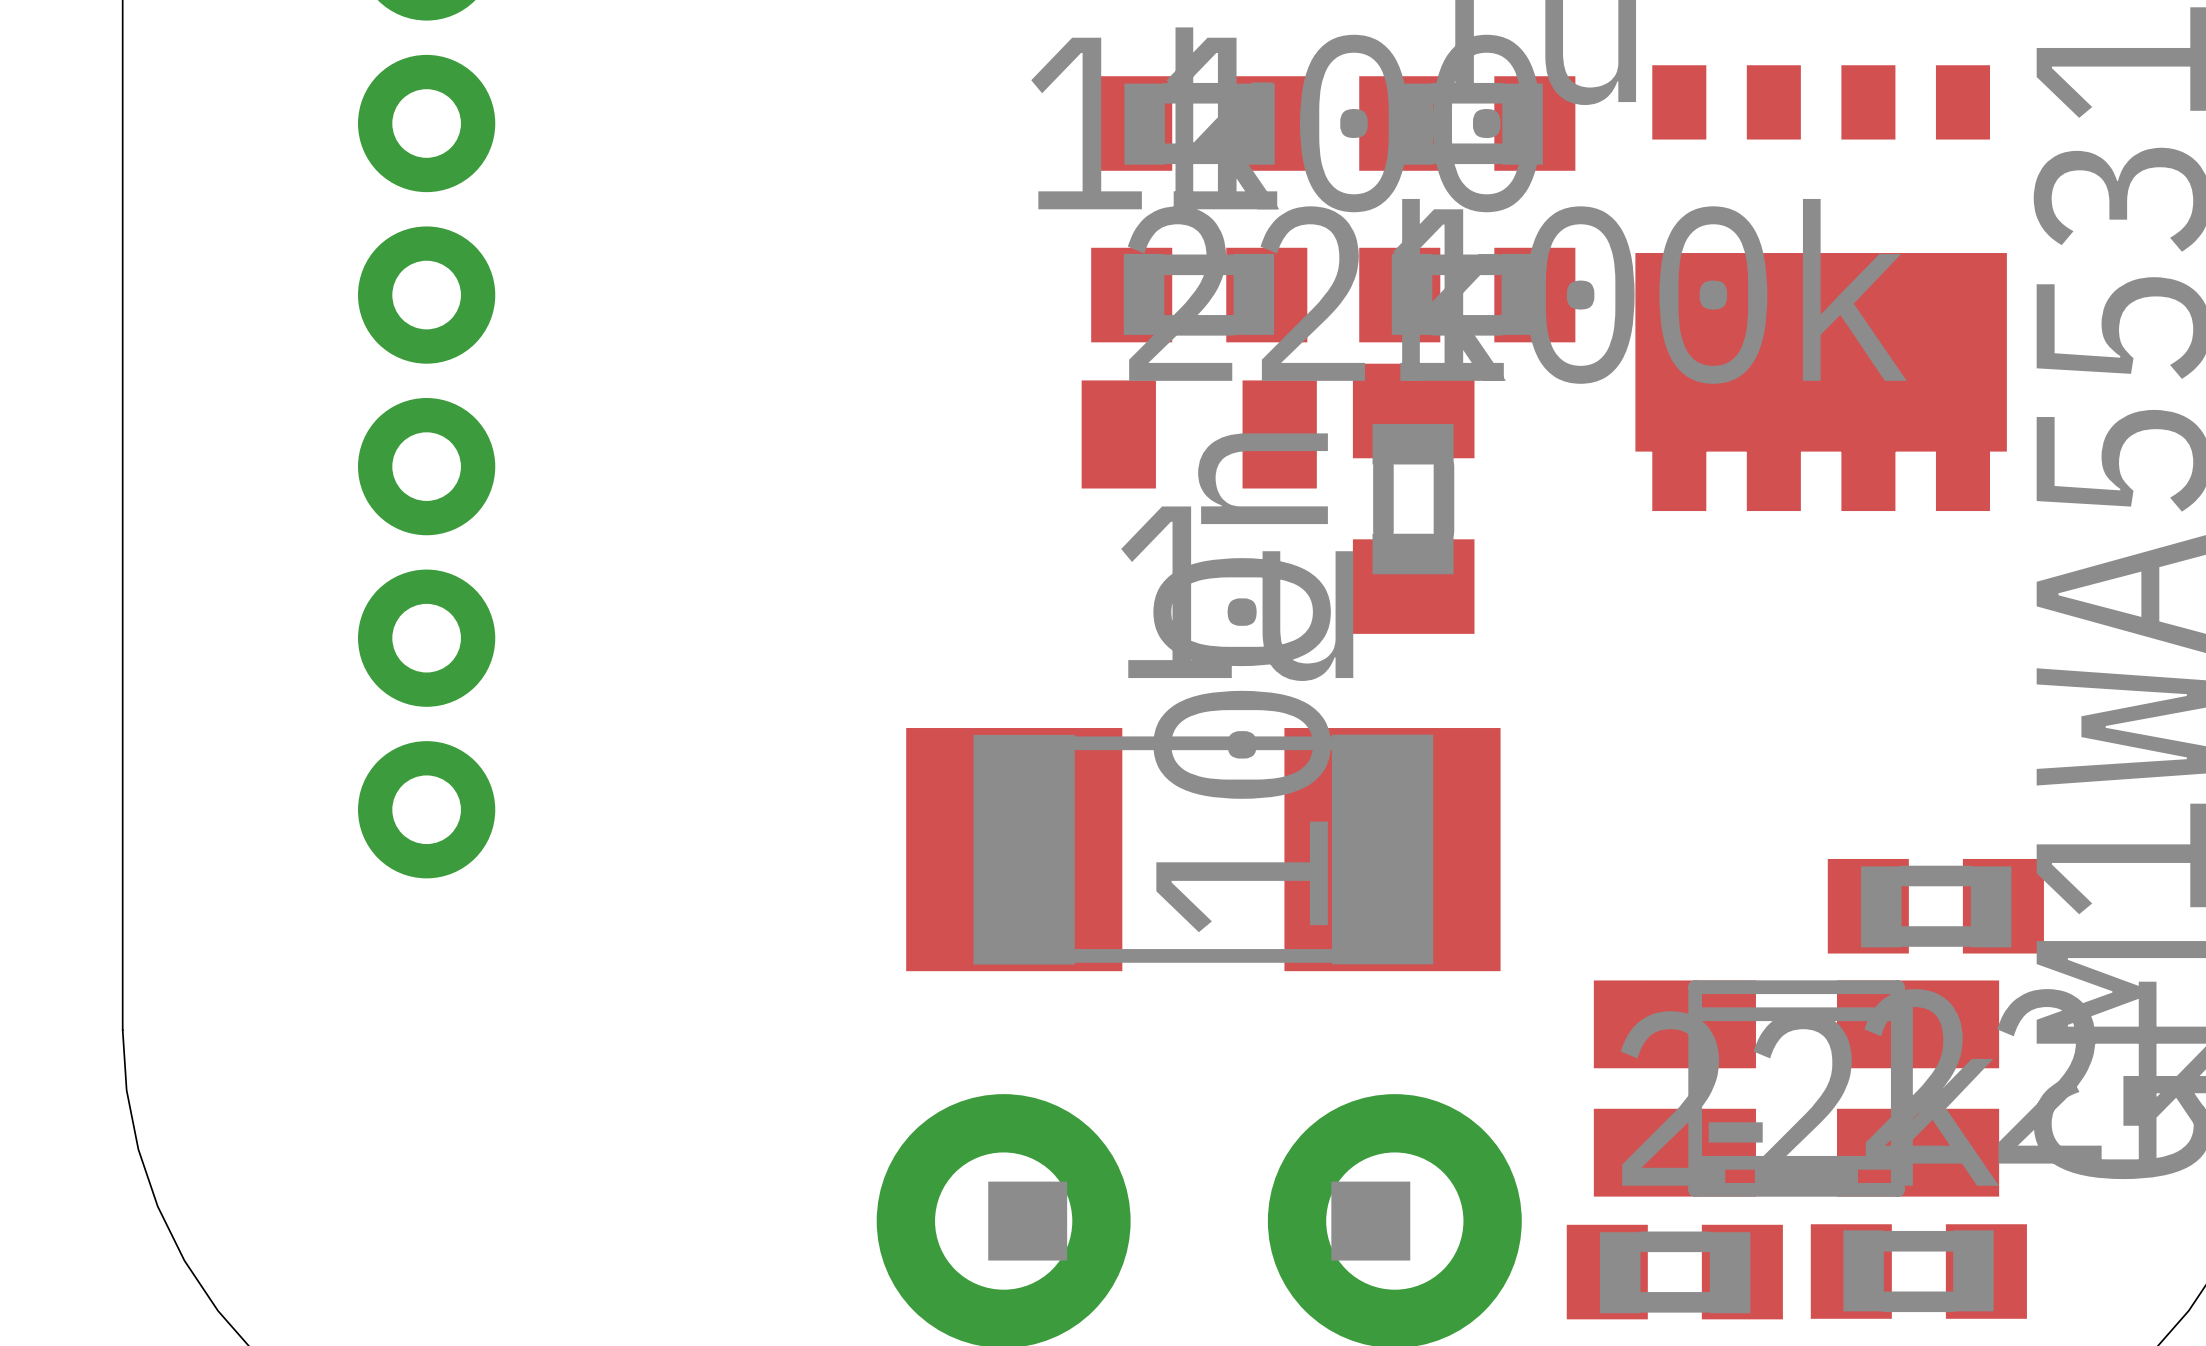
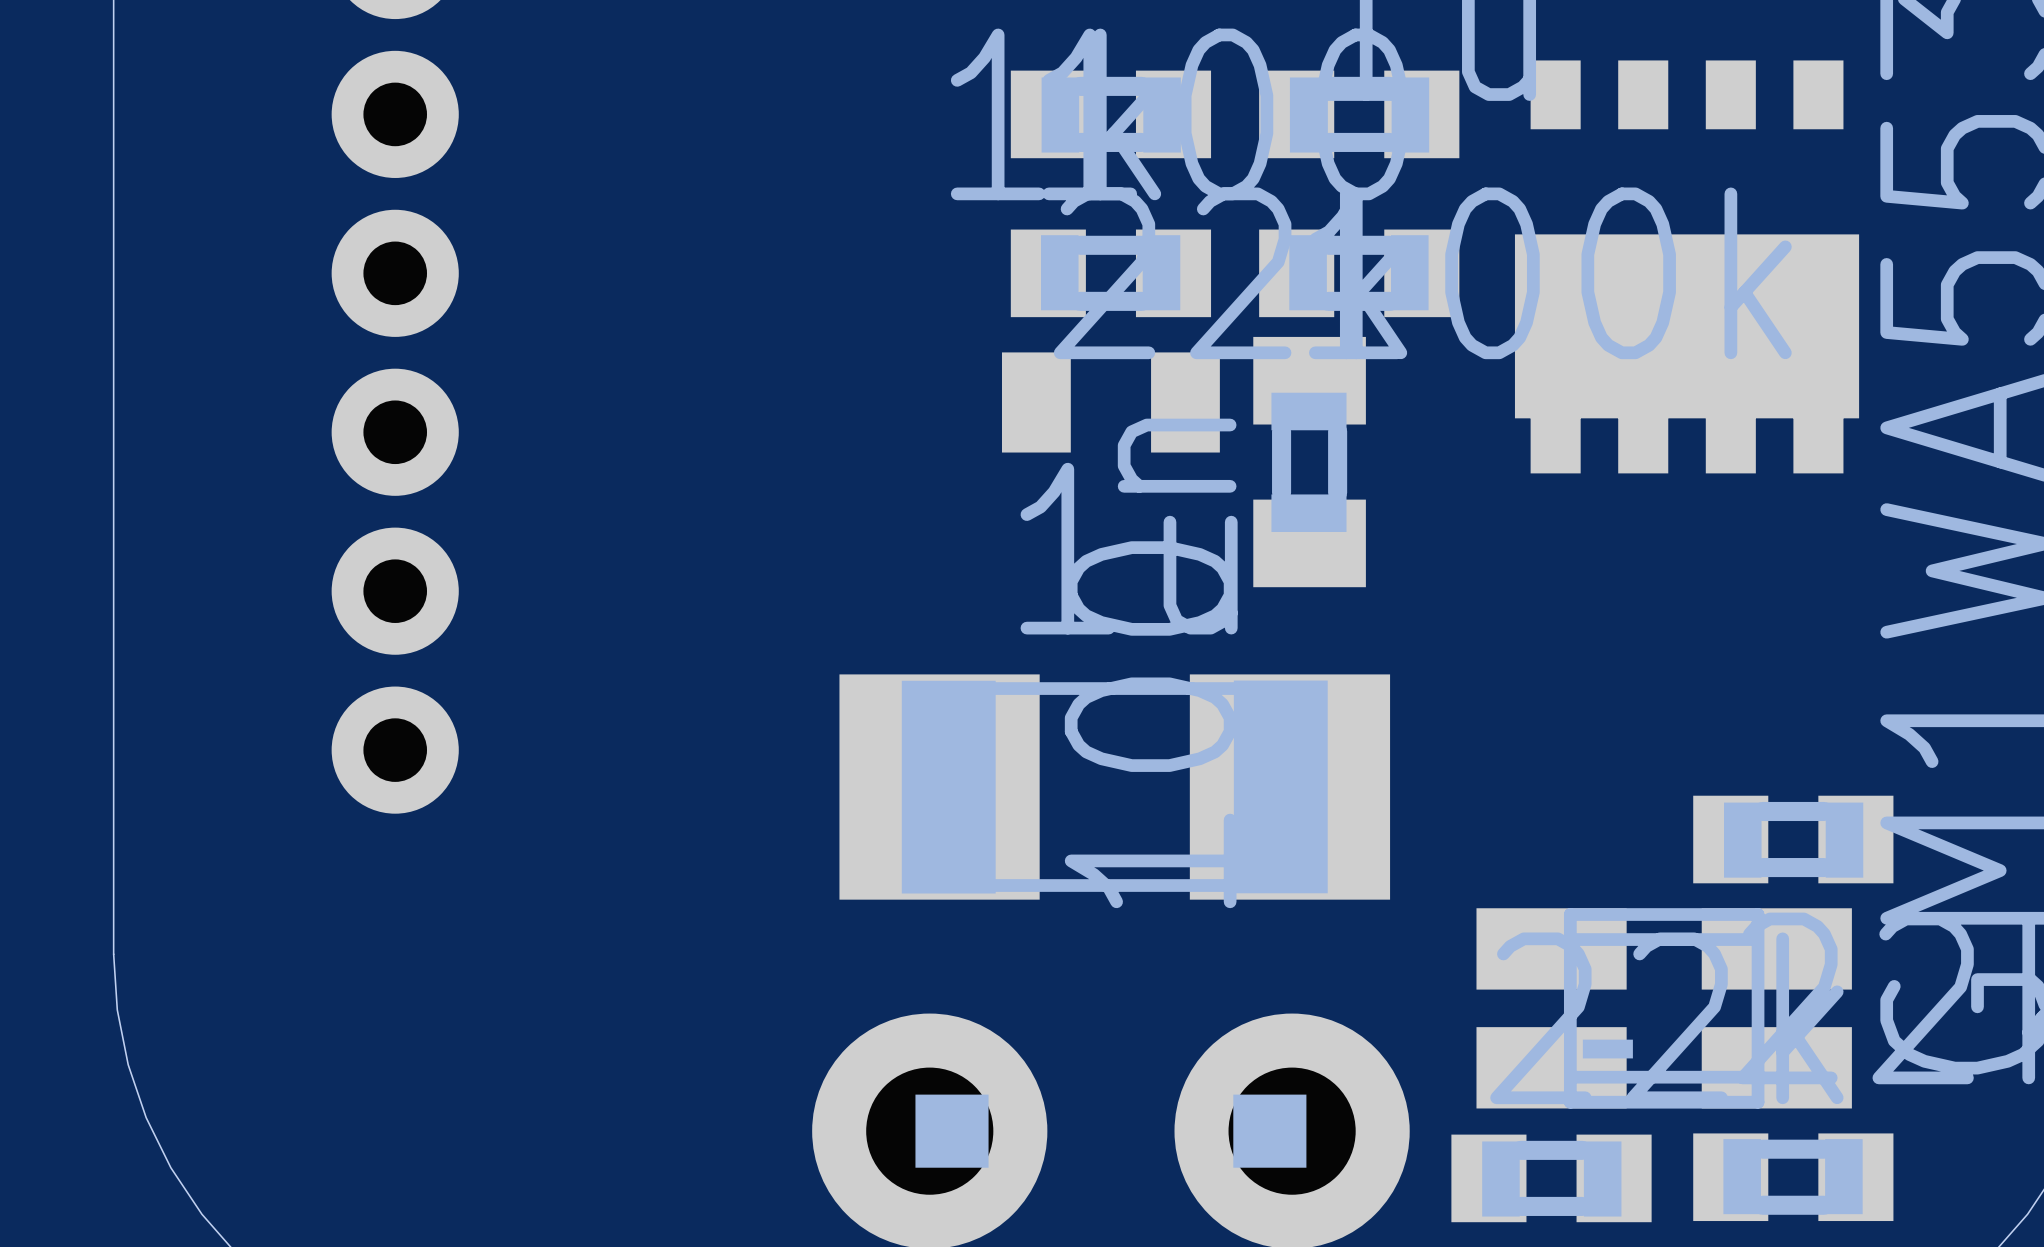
part position: (1918, 1271) -> (1793, 1177)

